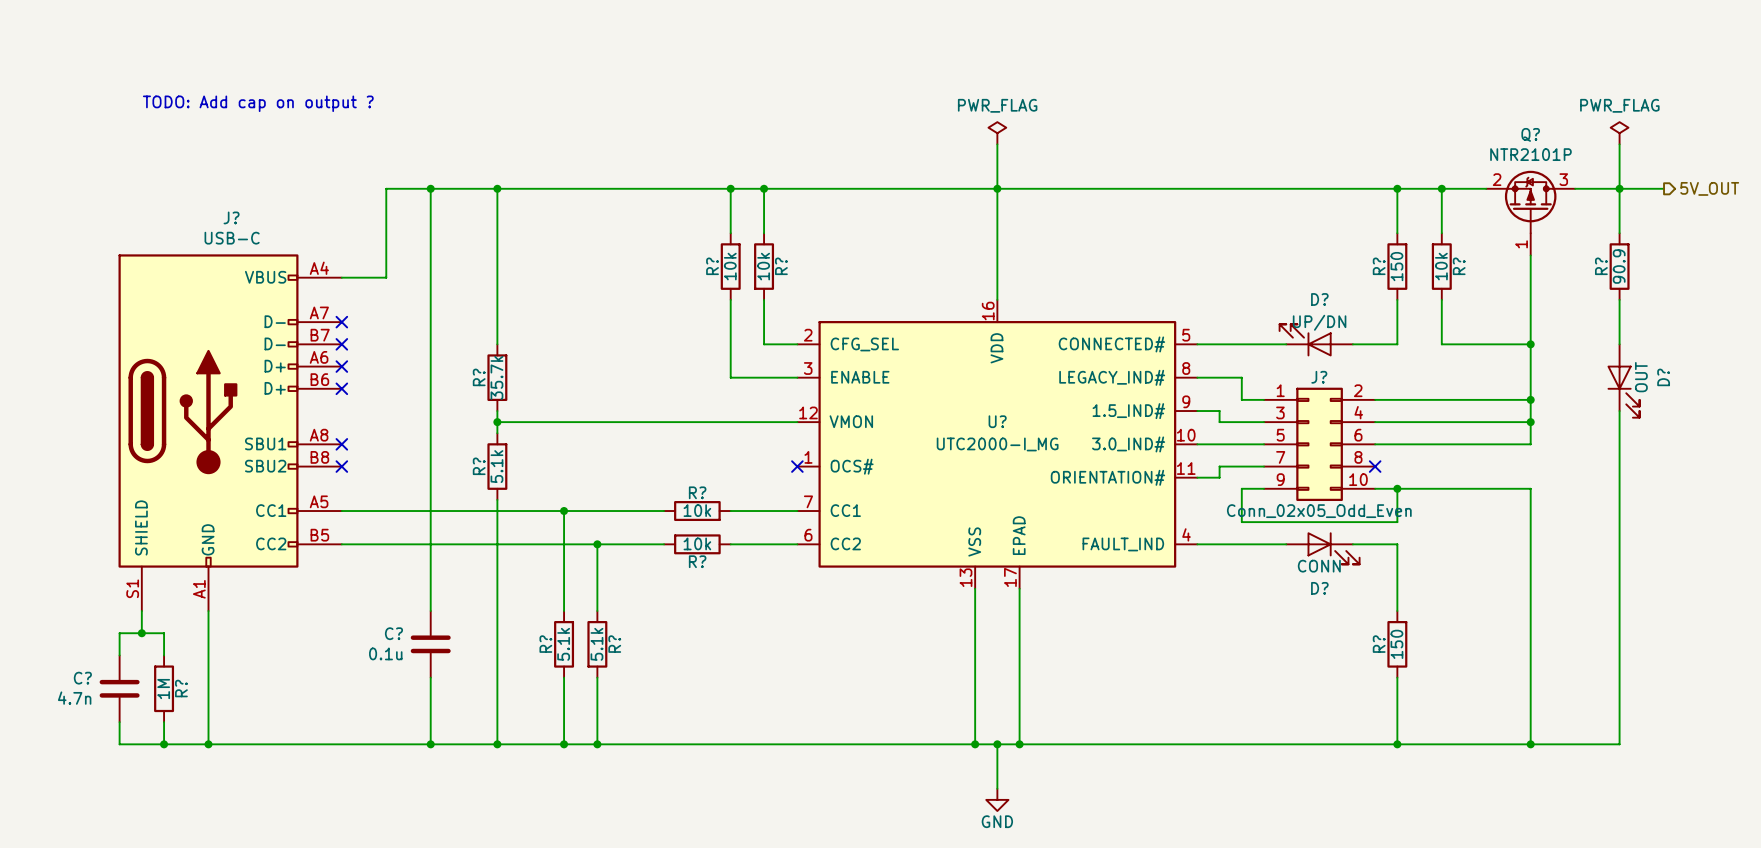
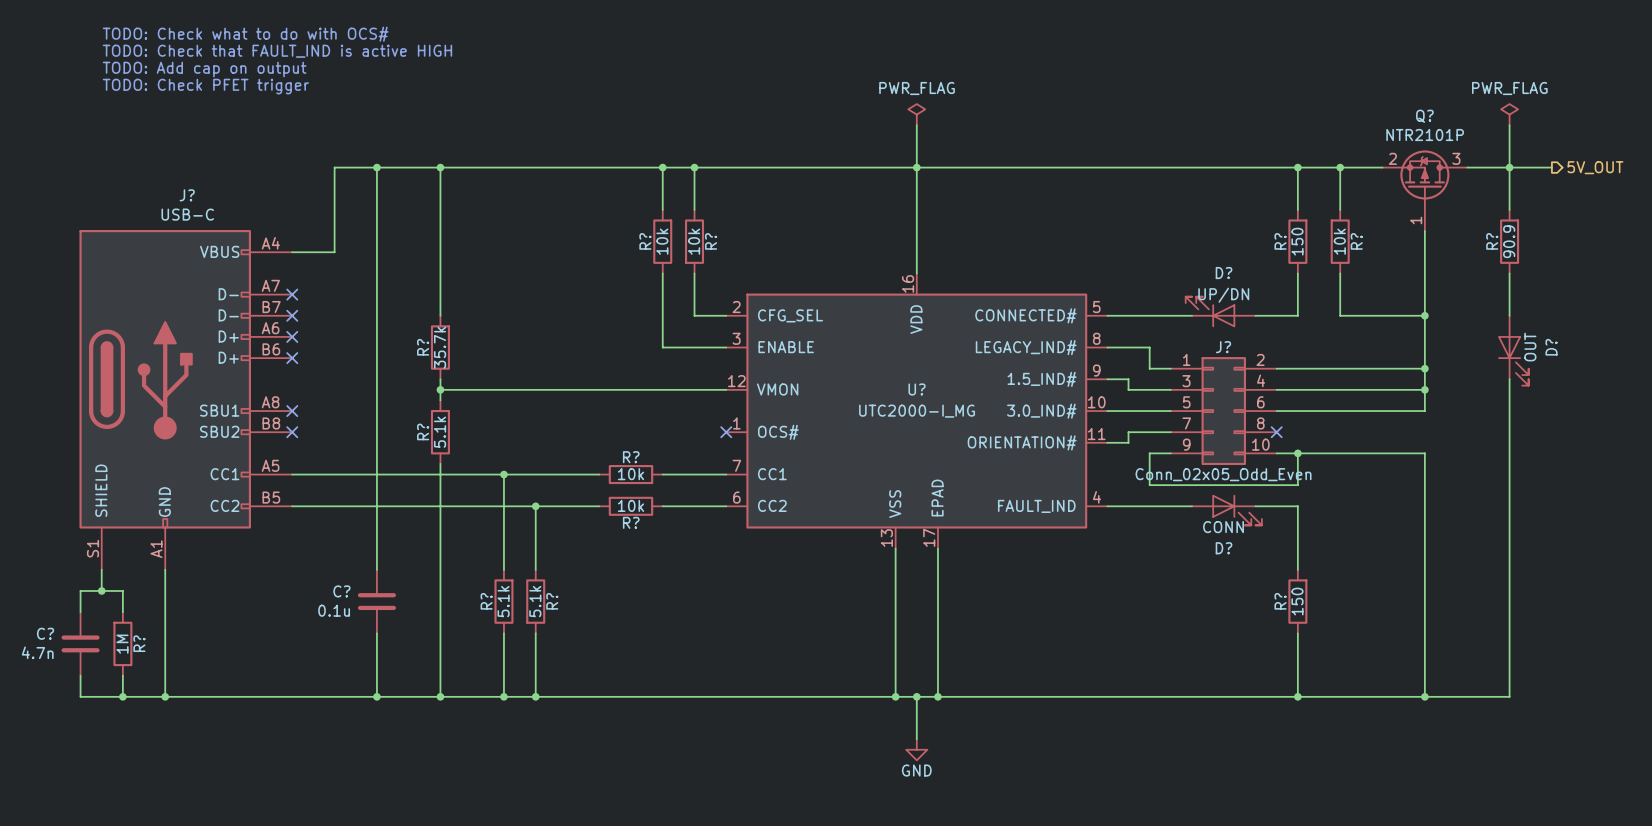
text: none -> TODO: Check what to do with OCS# (245, 34)
text: none -> TODO: Check that FAULT_IND is active HIGH (277, 51)
text: none -> TODO: Add cap on output (204, 69)
text: TODO: Add cap on output ? (258, 103) -> TODO: Check PFET trigger (205, 86)

